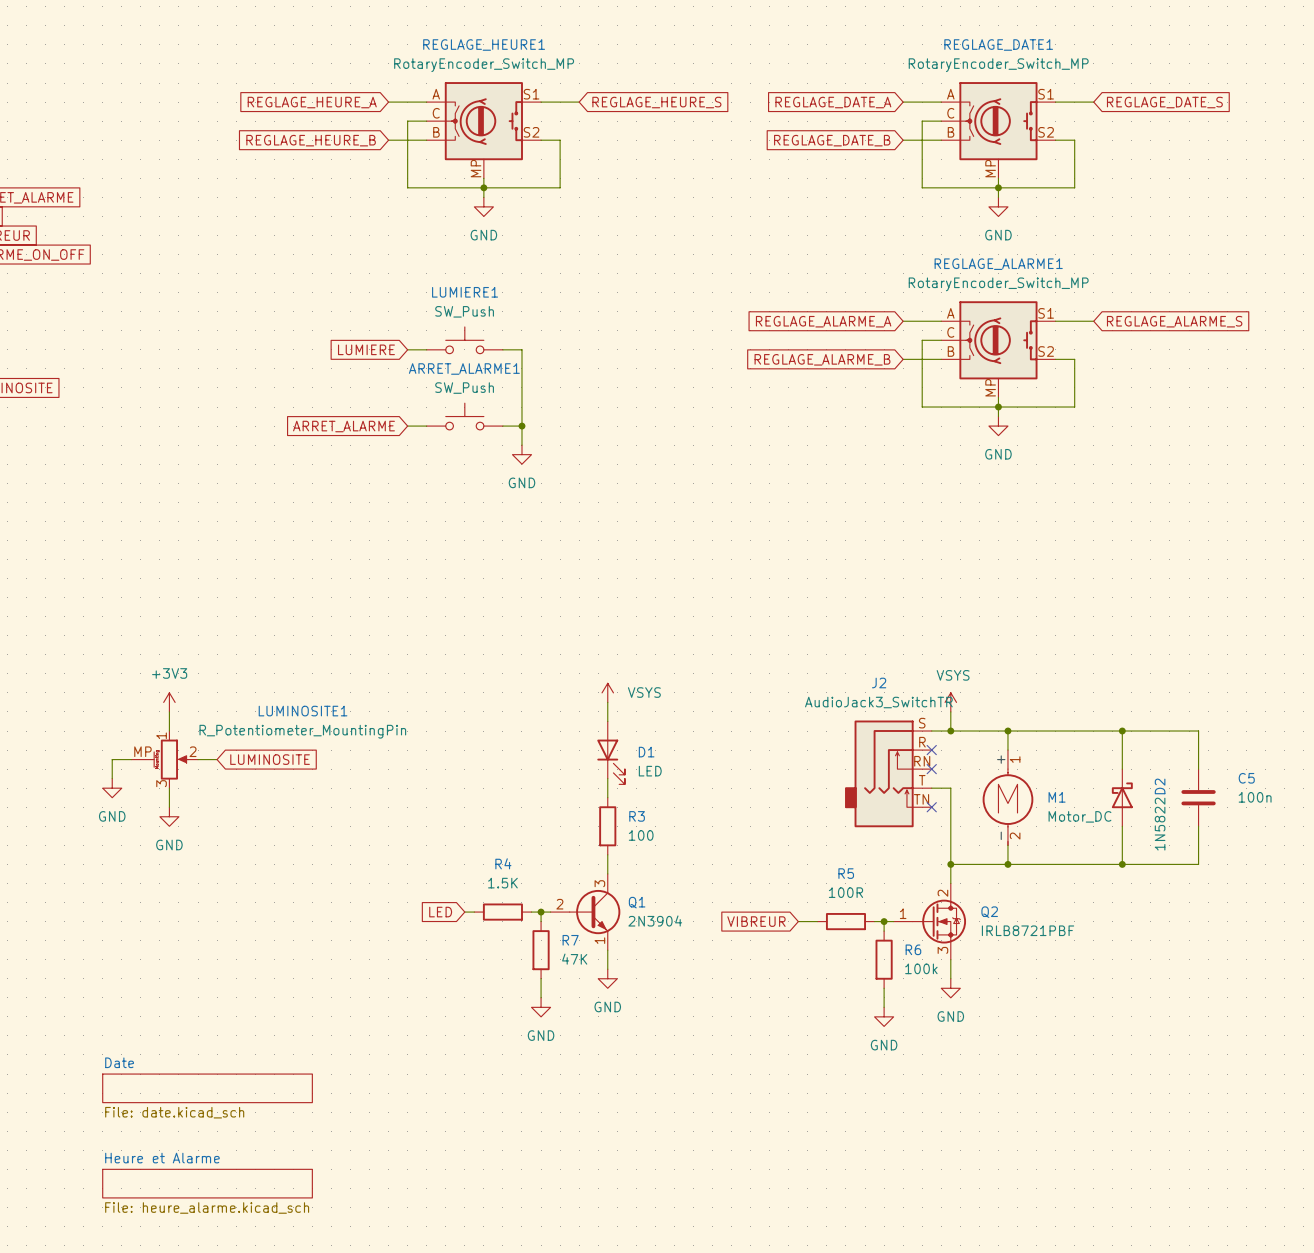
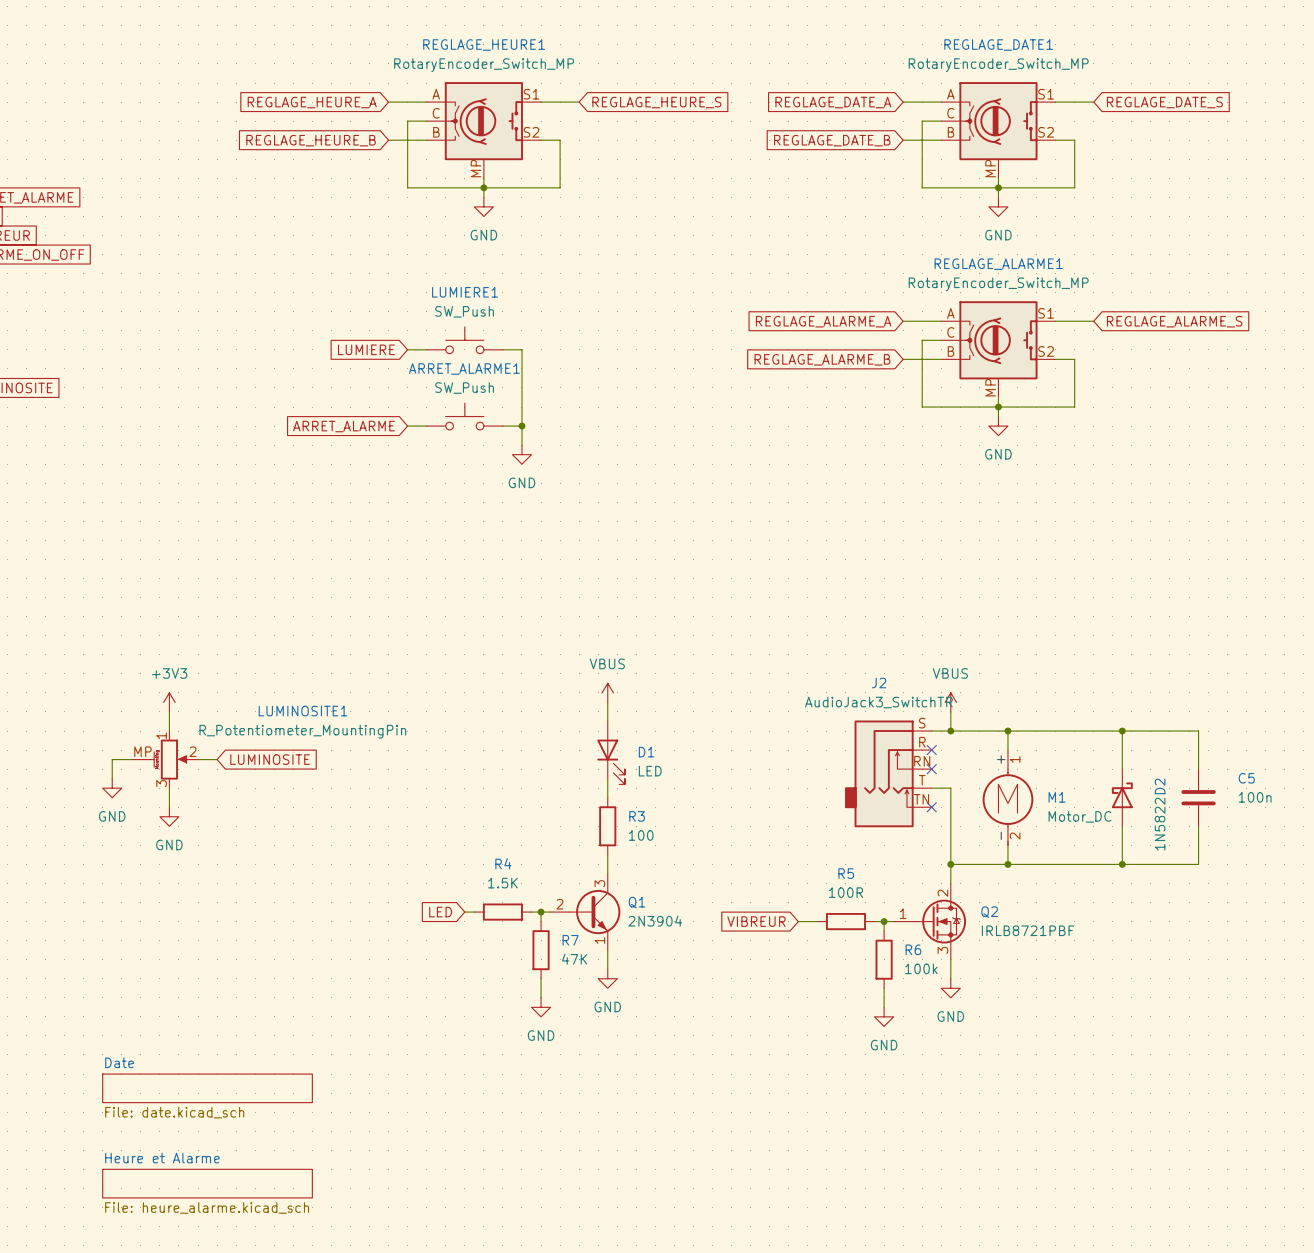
power symbol: VSYS (607, 692) -> VBUS (607, 692)
power symbol: VSYS (950, 702) -> VBUS (950, 702)

